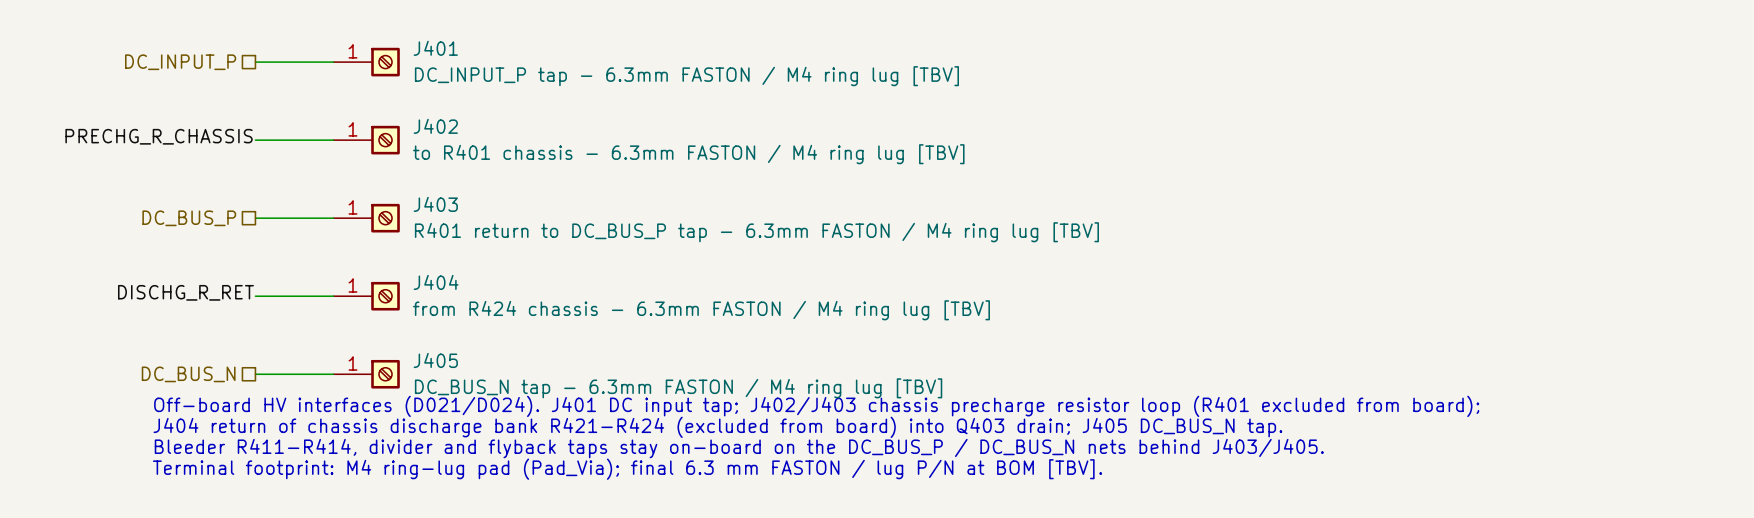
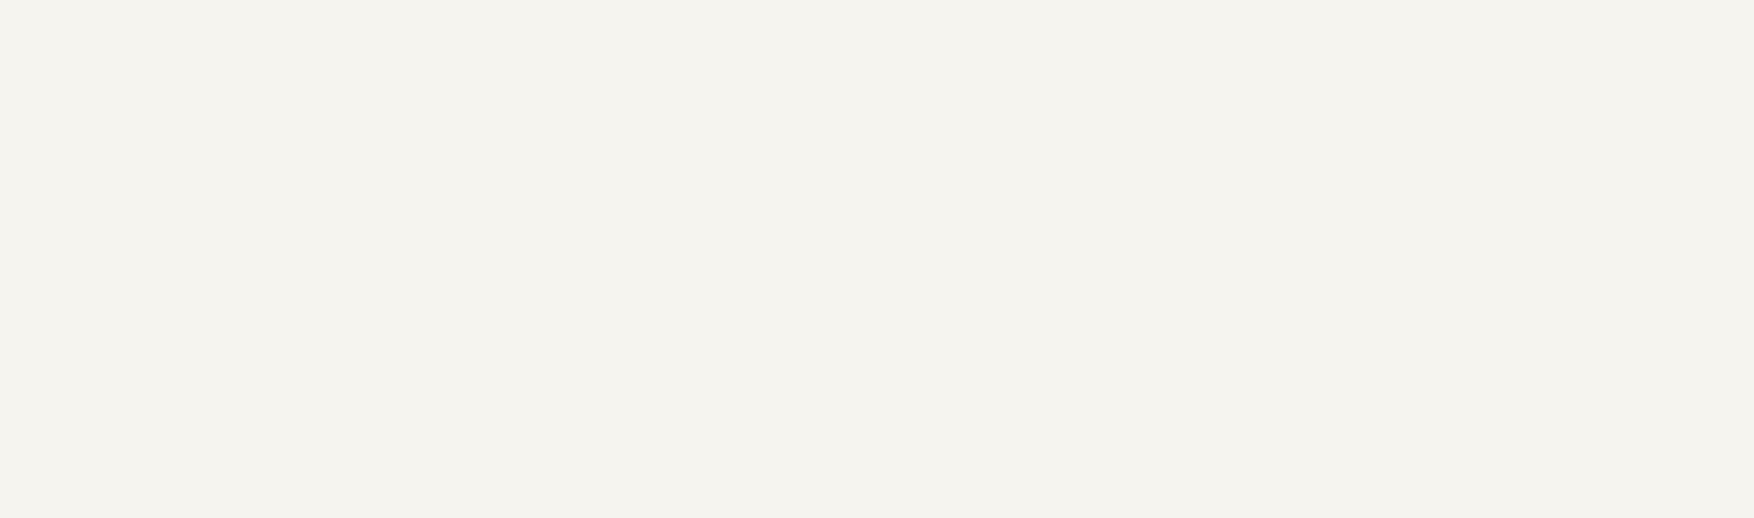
hierarchical label: DC_INPUT_P (180, 62) -> none
wire: (255, 62) (333, 62) -> none
J401: DC_INPUT_P tap - 6.3mm FASTON / M4 ring lug [TBV] (366, 62) -> none
label: PRECHG_R_CHASSIS (159, 136) -> none
wire: (255, 140) (333, 140) -> none
J402: to R401 chassis - 6.3mm FASTON / M4 ring lug [TBV] (366, 140) -> none
hierarchical label: DC_BUS_P (189, 218) -> none
wire: (255, 218) (333, 218) -> none
J403: R401 return to DC_BUS_P tap - 6.3mm FASTON / M4 ring lug [TBV] (366, 218) -> none
label: DISCHG_R_RET (185, 292) -> none
wire: (255, 296) (333, 296) -> none
J404: from R424 chassis - 6.3mm FASTON / M4 ring lug [TBV] (366, 296) -> none
hierarchical label: DC_BUS_N (188, 374) -> none
wire: (255, 374) (333, 374) -> none
J405: DC_BUS_N tap - 6.3mm FASTON / M4 ring lug [TBV] (366, 374) -> none
text: Off-board HV interfaces (D021/D024). J401 DC input tap; J402/J403 chassis precharge resistor loop (R401 excluded from board); (816, 406) -> none
text: J404 return of chassis discharge bank R421-R424 (excluded from board) into Q403 drain; J405 DC_BUS_N tap. (717, 427) -> none
text: Bleeder R411-R414, divider and flyback taps stay on-board on the DC_BUS_P / DC_BUS_N nets behind J403/J405. (739, 448) -> none
text: Terminal footprint: M4 ring-lug pad (Pad_Via); final 6.3 mm FASTON / lug P/N at BOM [TBV]. (627, 469) -> none

